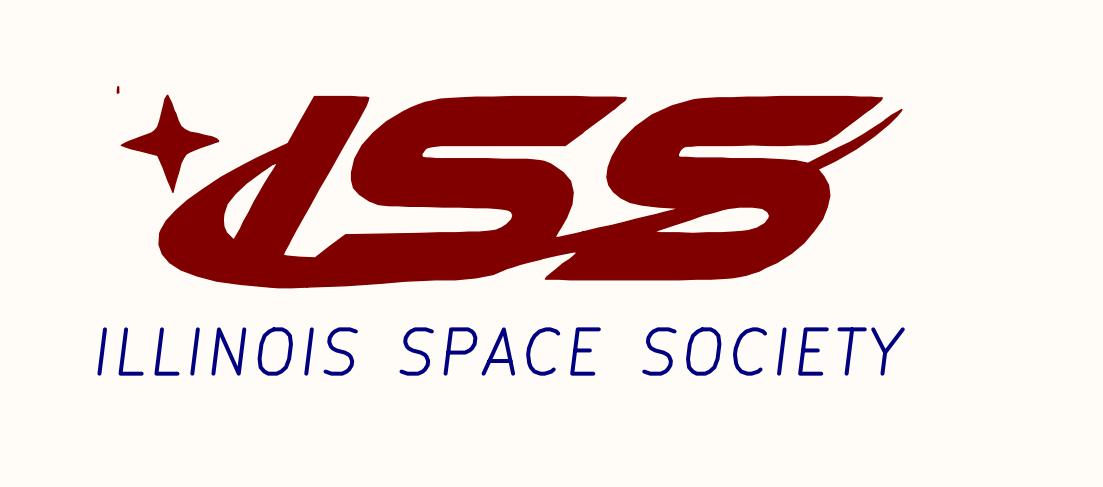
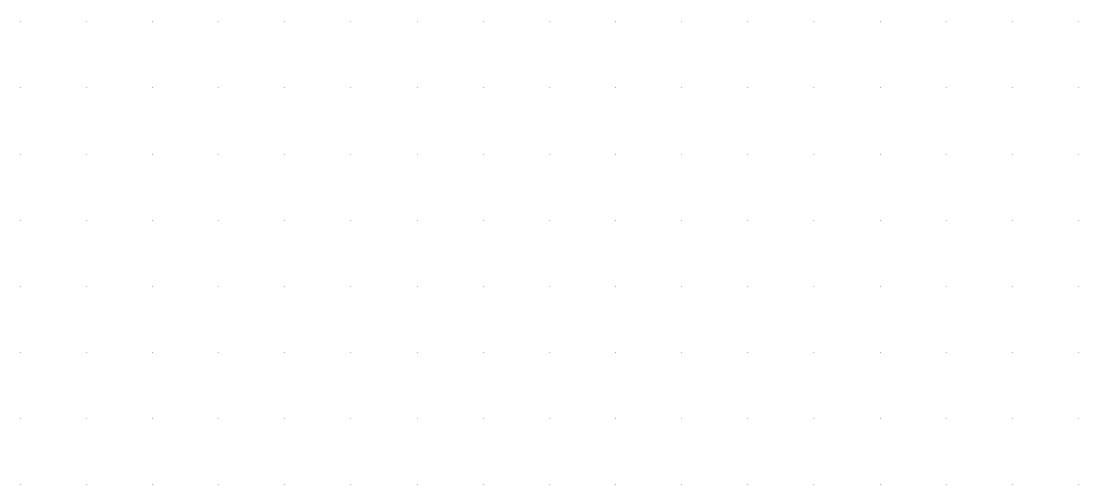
power symbol: (509, 187) -> none
text: ILLINOIS SPACE SOCIETY (501, 351) -> none

